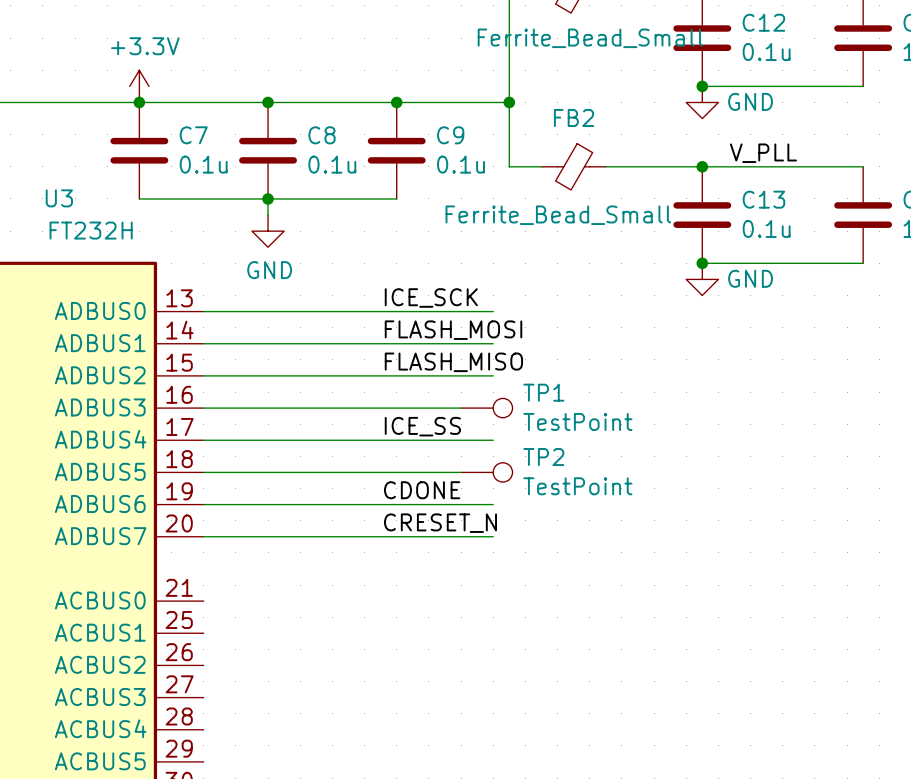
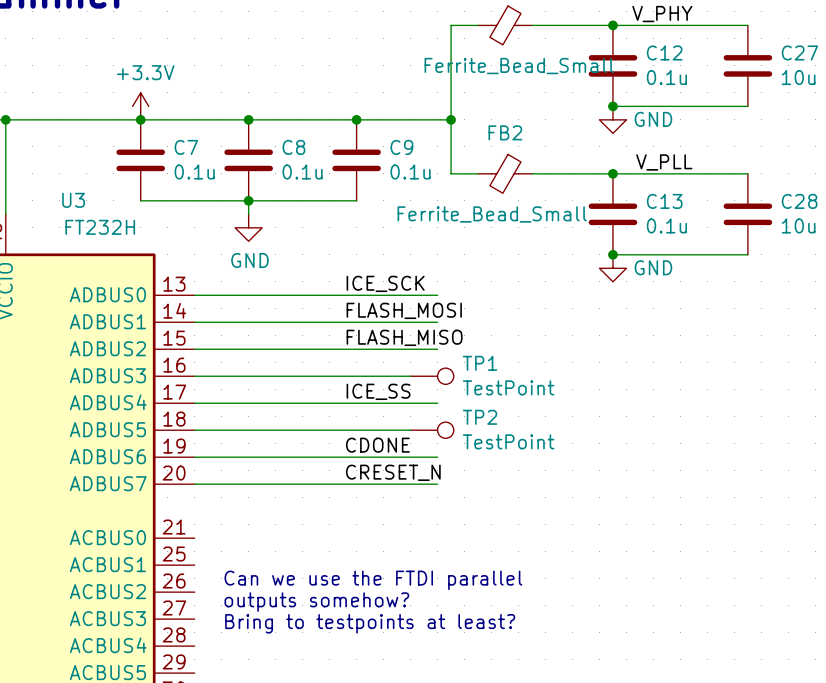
text: none -> Can we use the FTDI parallel (373, 580)
text: none -> outputs somehow? (316, 602)
text: none -> Bring to testpoints at least? (370, 623)

